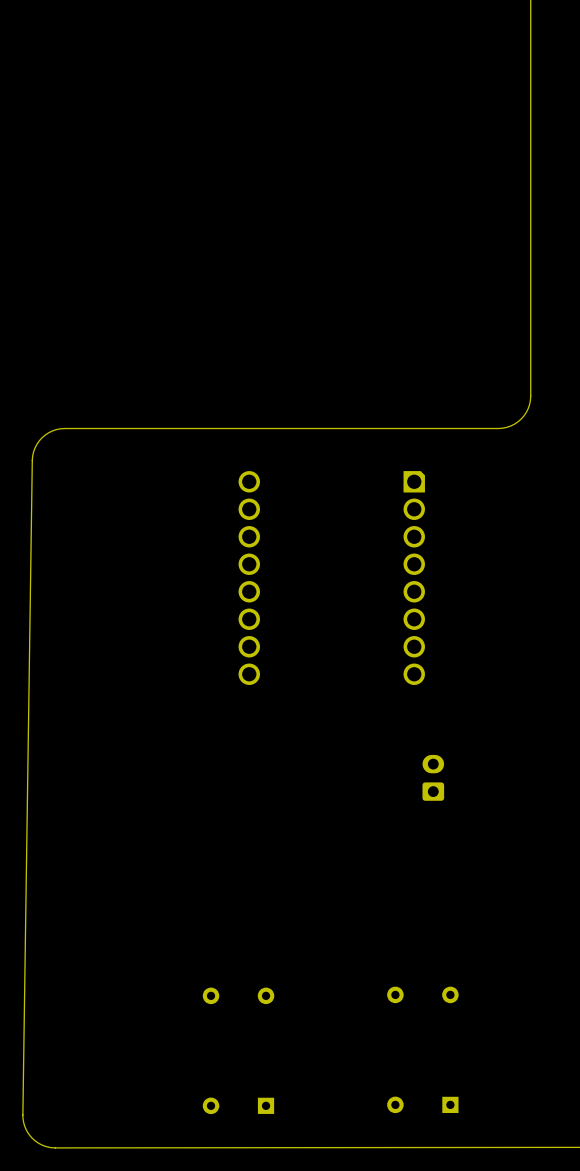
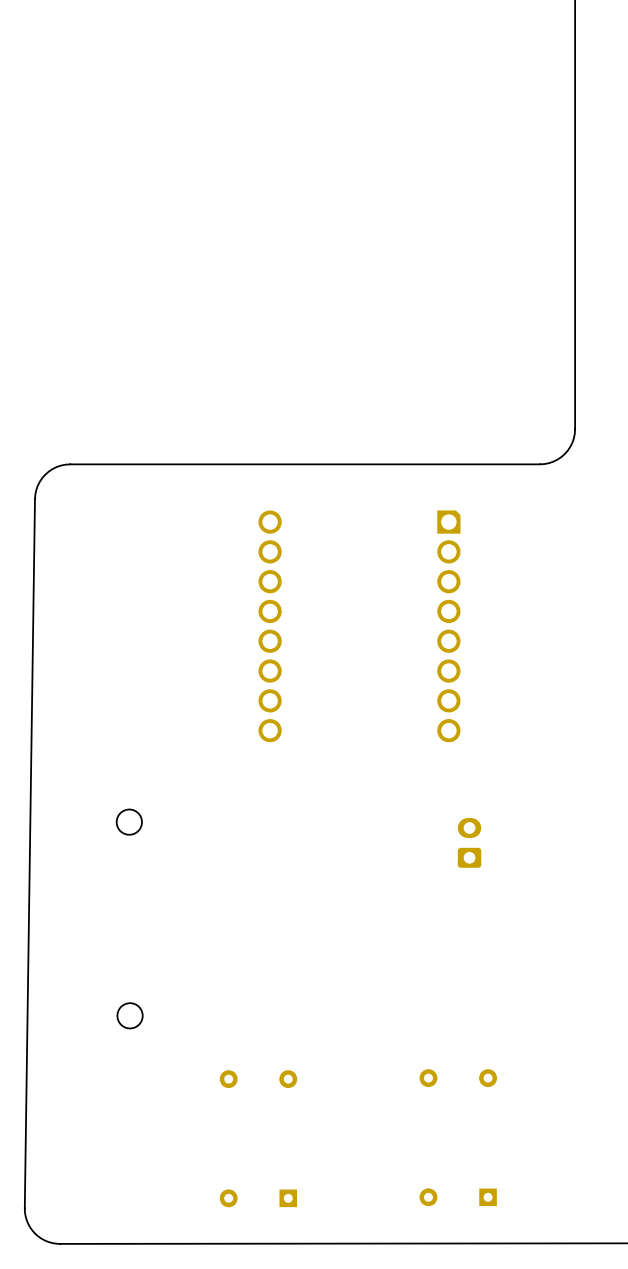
round board edge: none -> [116, 809, 143, 836]
round board edge: none -> [117, 1002, 144, 1029]

